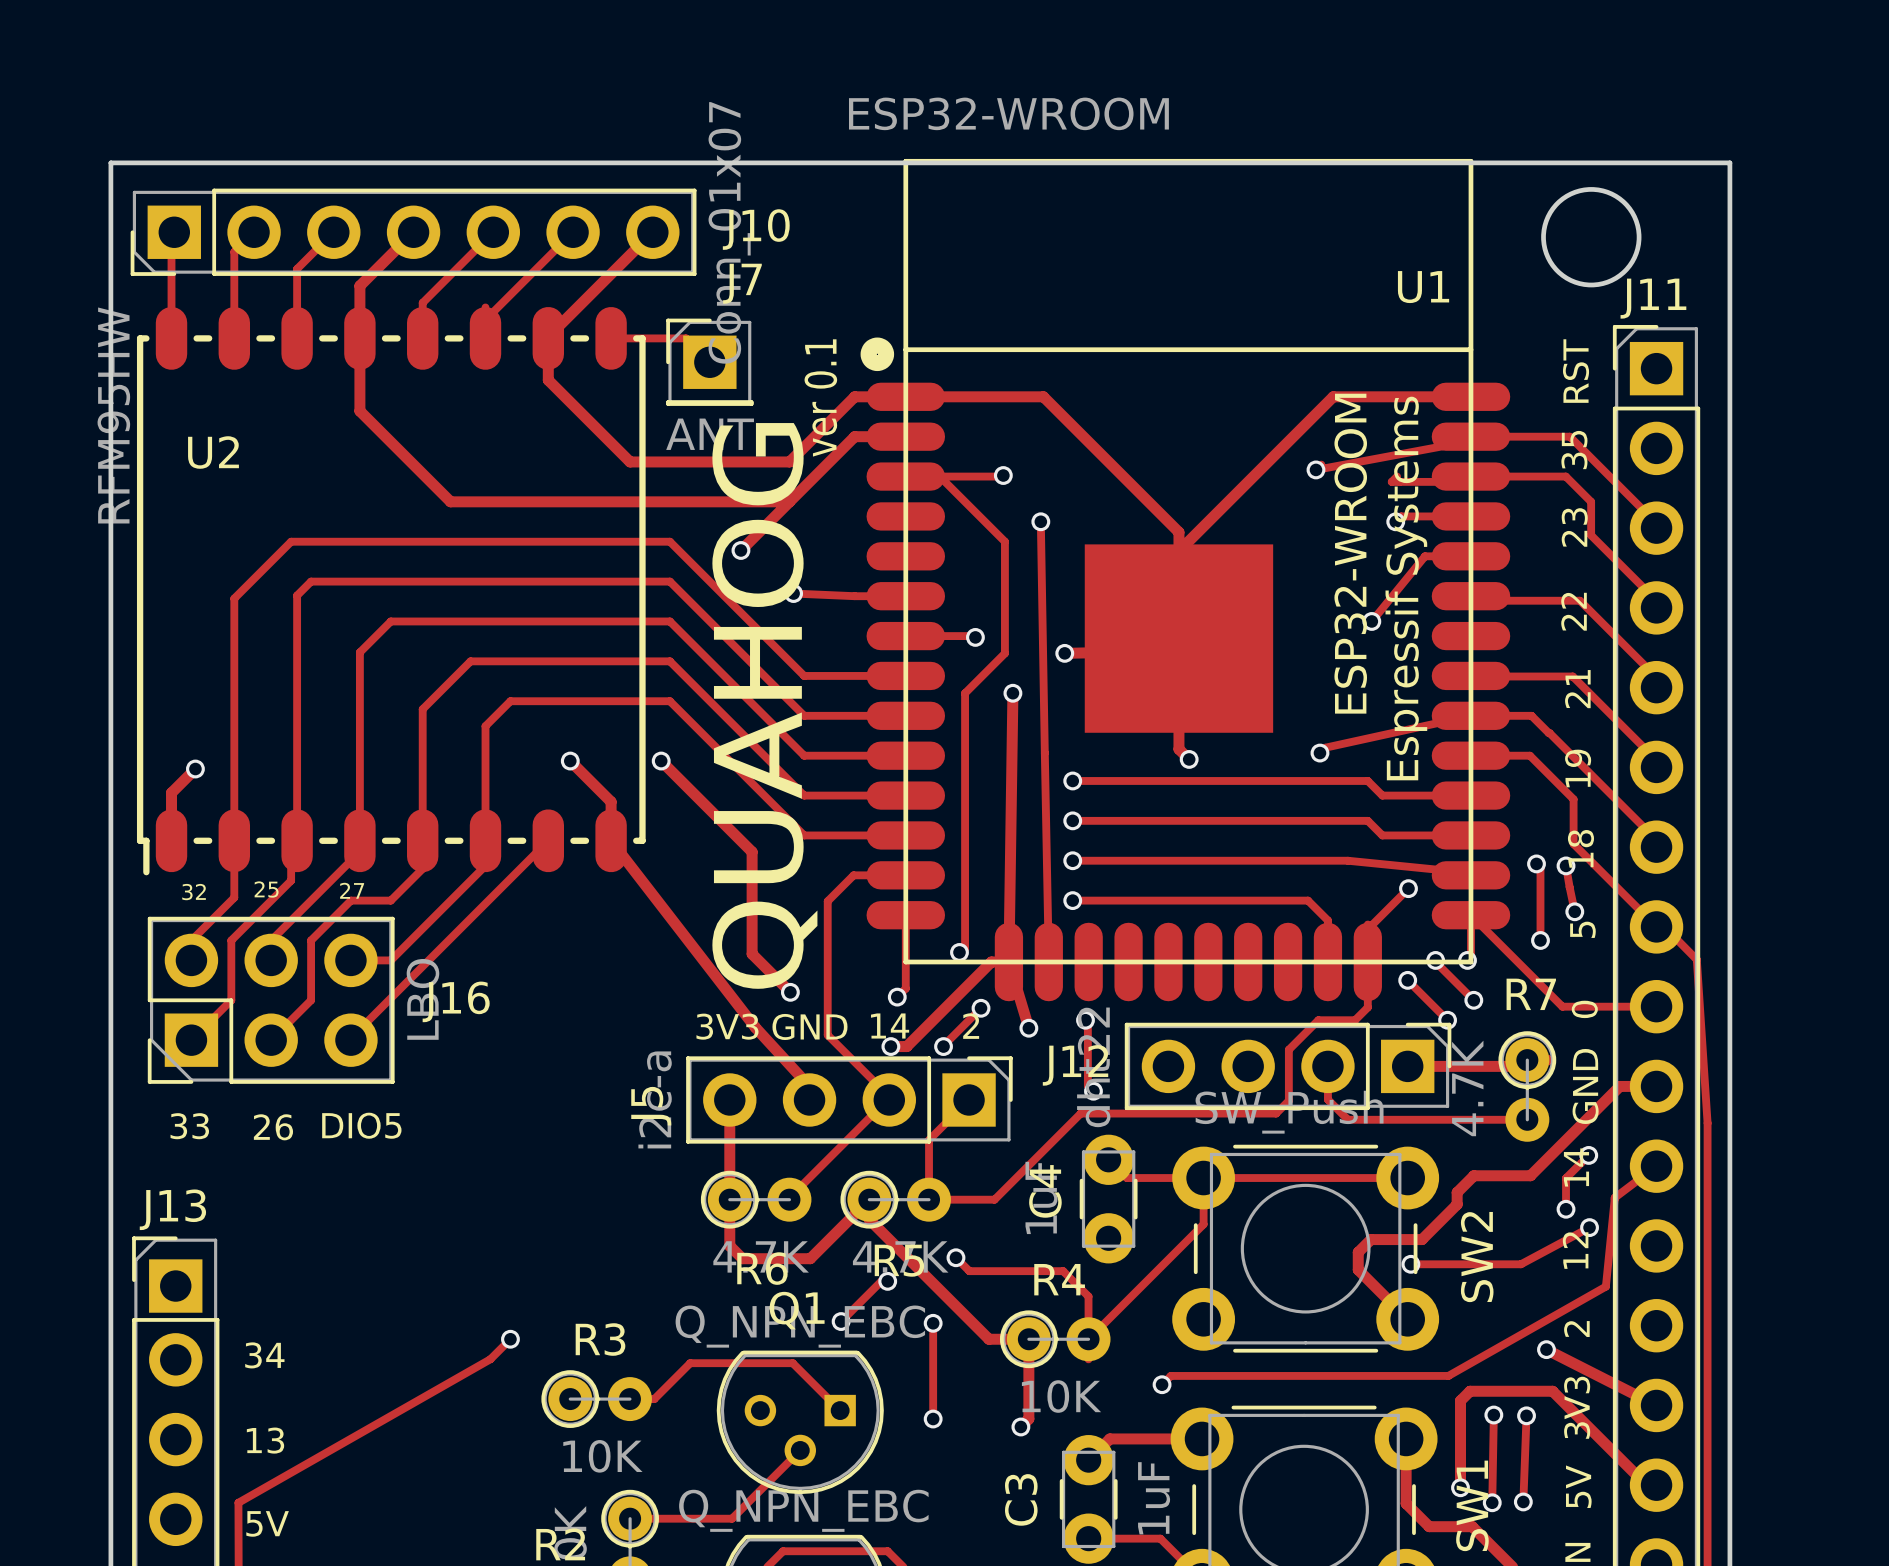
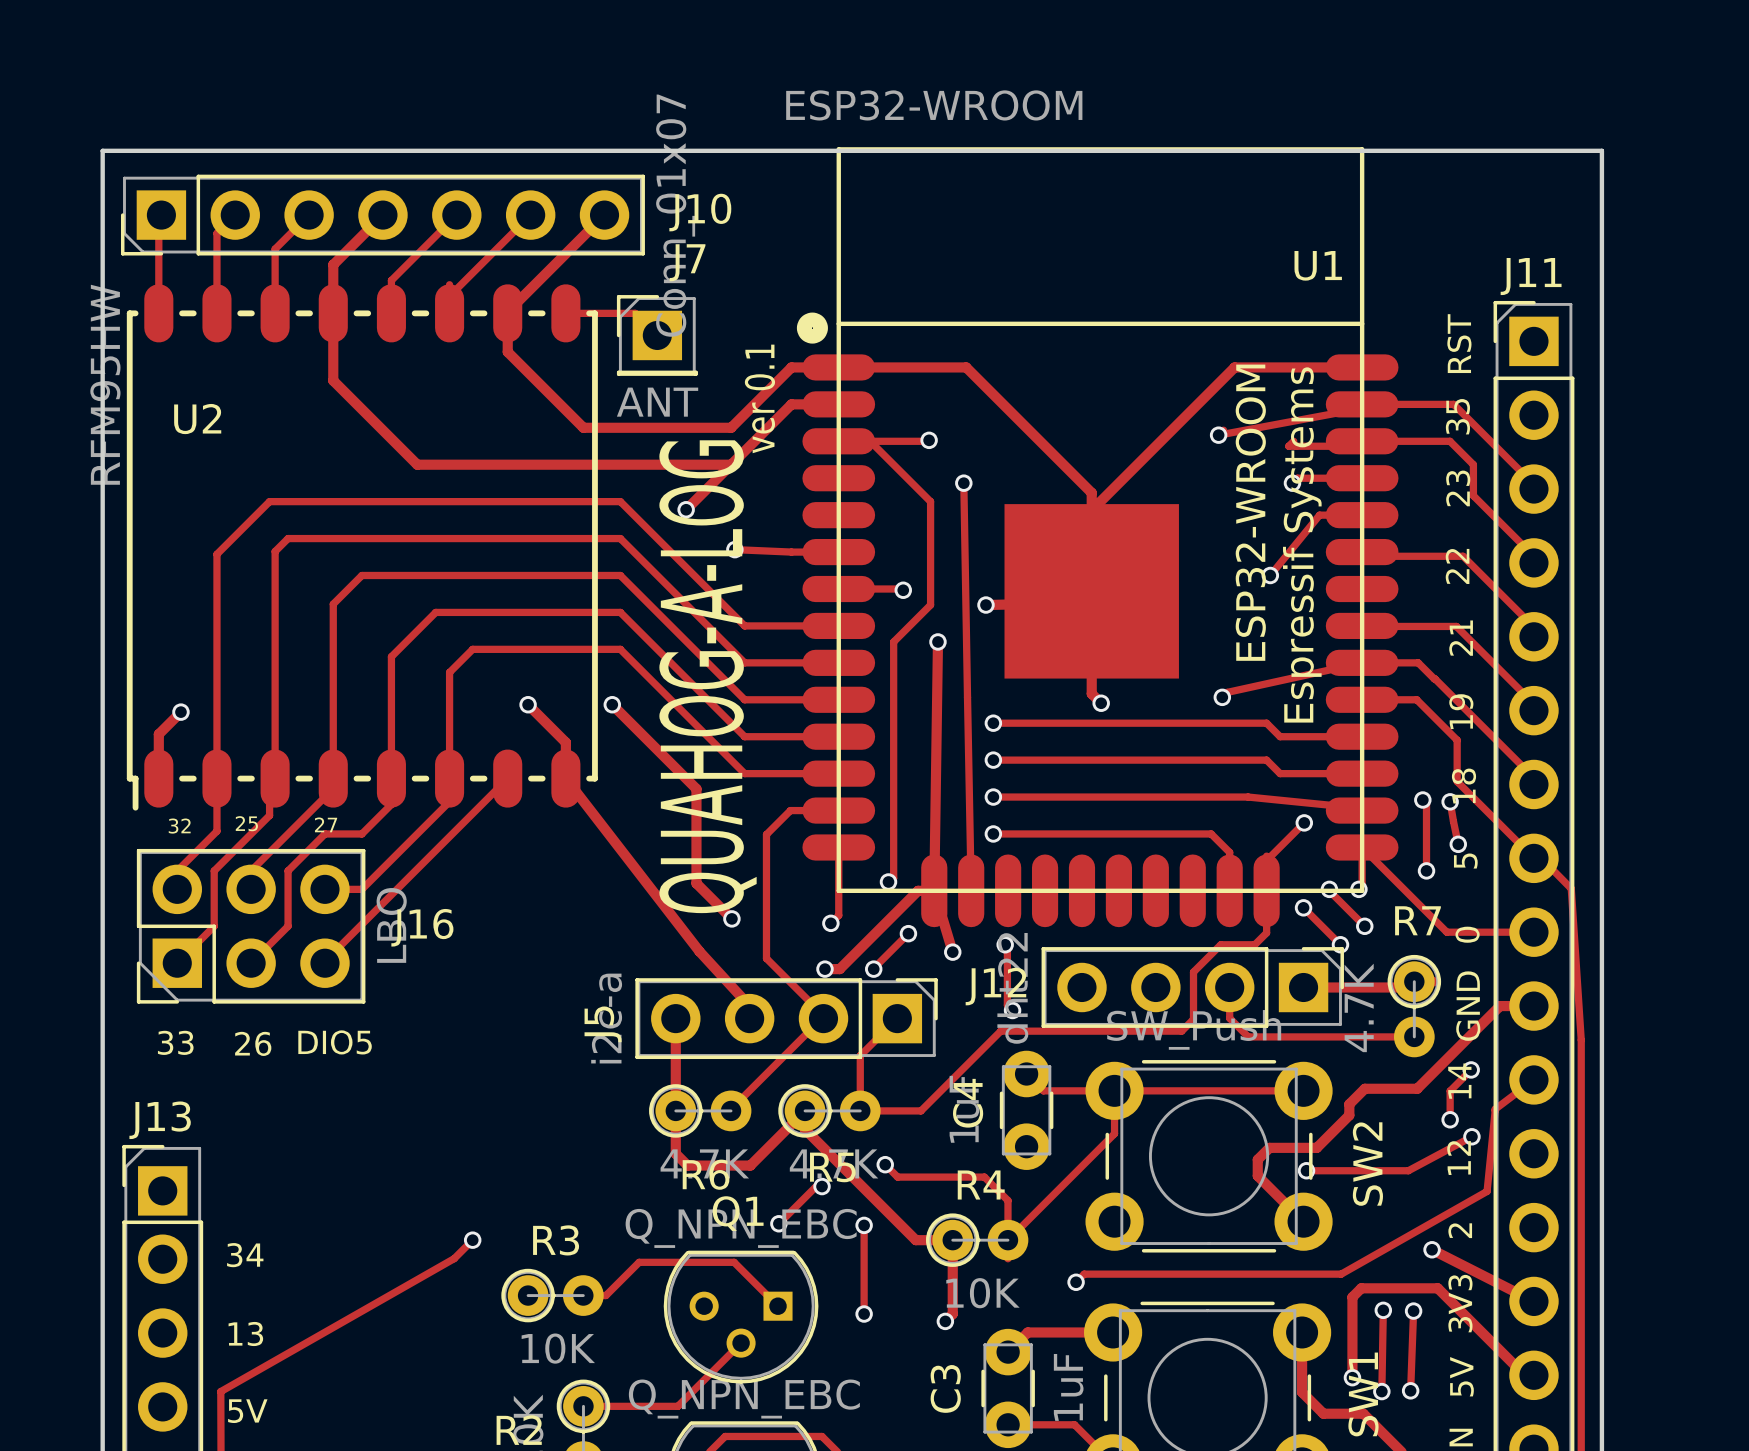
round board edge: [1541, 187, 1642, 288] -> none
text position: ver 0.1 (820, 397) -> ver 0.1 (759, 398)
text: QUAHOG (764, 705) -> QUAHOG-A-LOG (708, 676)
text: 3V3 (727, 1026) -> none
text: GND (809, 1026) -> none
text: 14 (890, 1026) -> none
text: 2 (971, 1026) -> none

